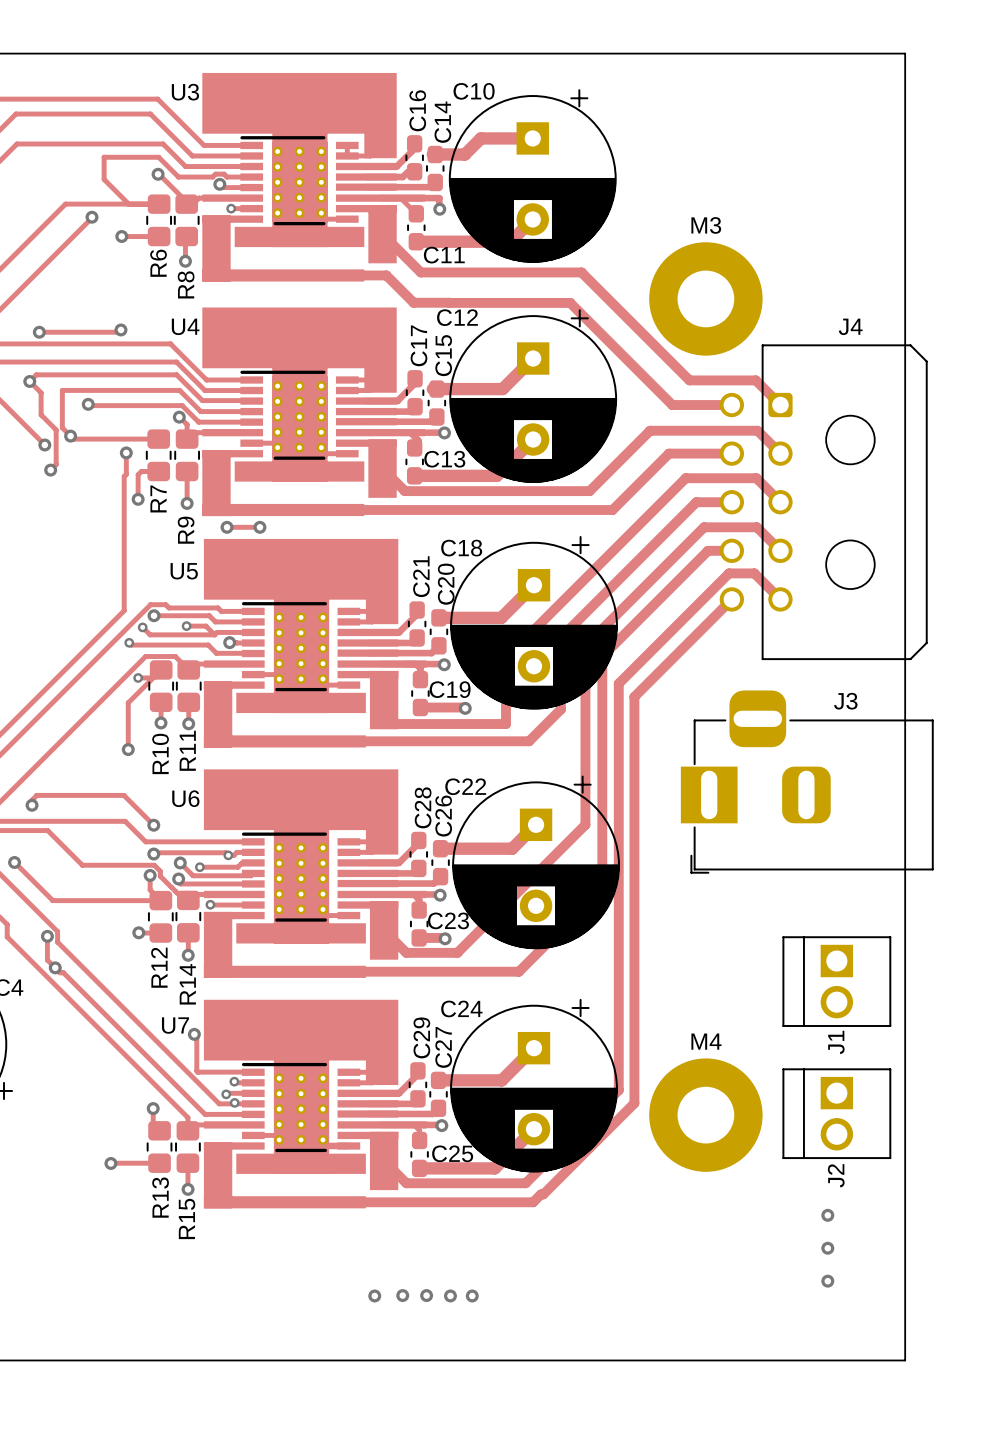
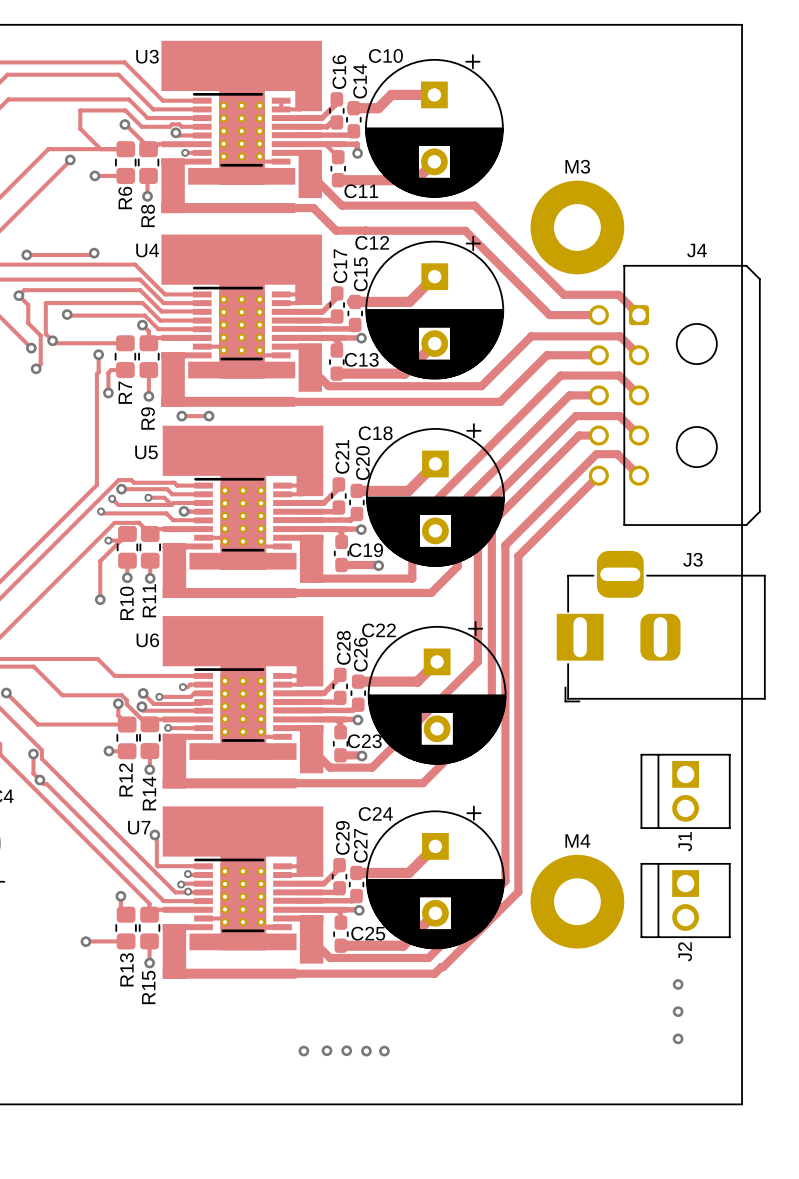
track: (32, 805) (32, 800) (36, 795) (123, 795) (153, 825) -> none
via: (32, 805) -> none
via: (153, 825) -> none
track: (153, 854) (225, 852) (228, 855) -> none
via: (153, 854) -> none

